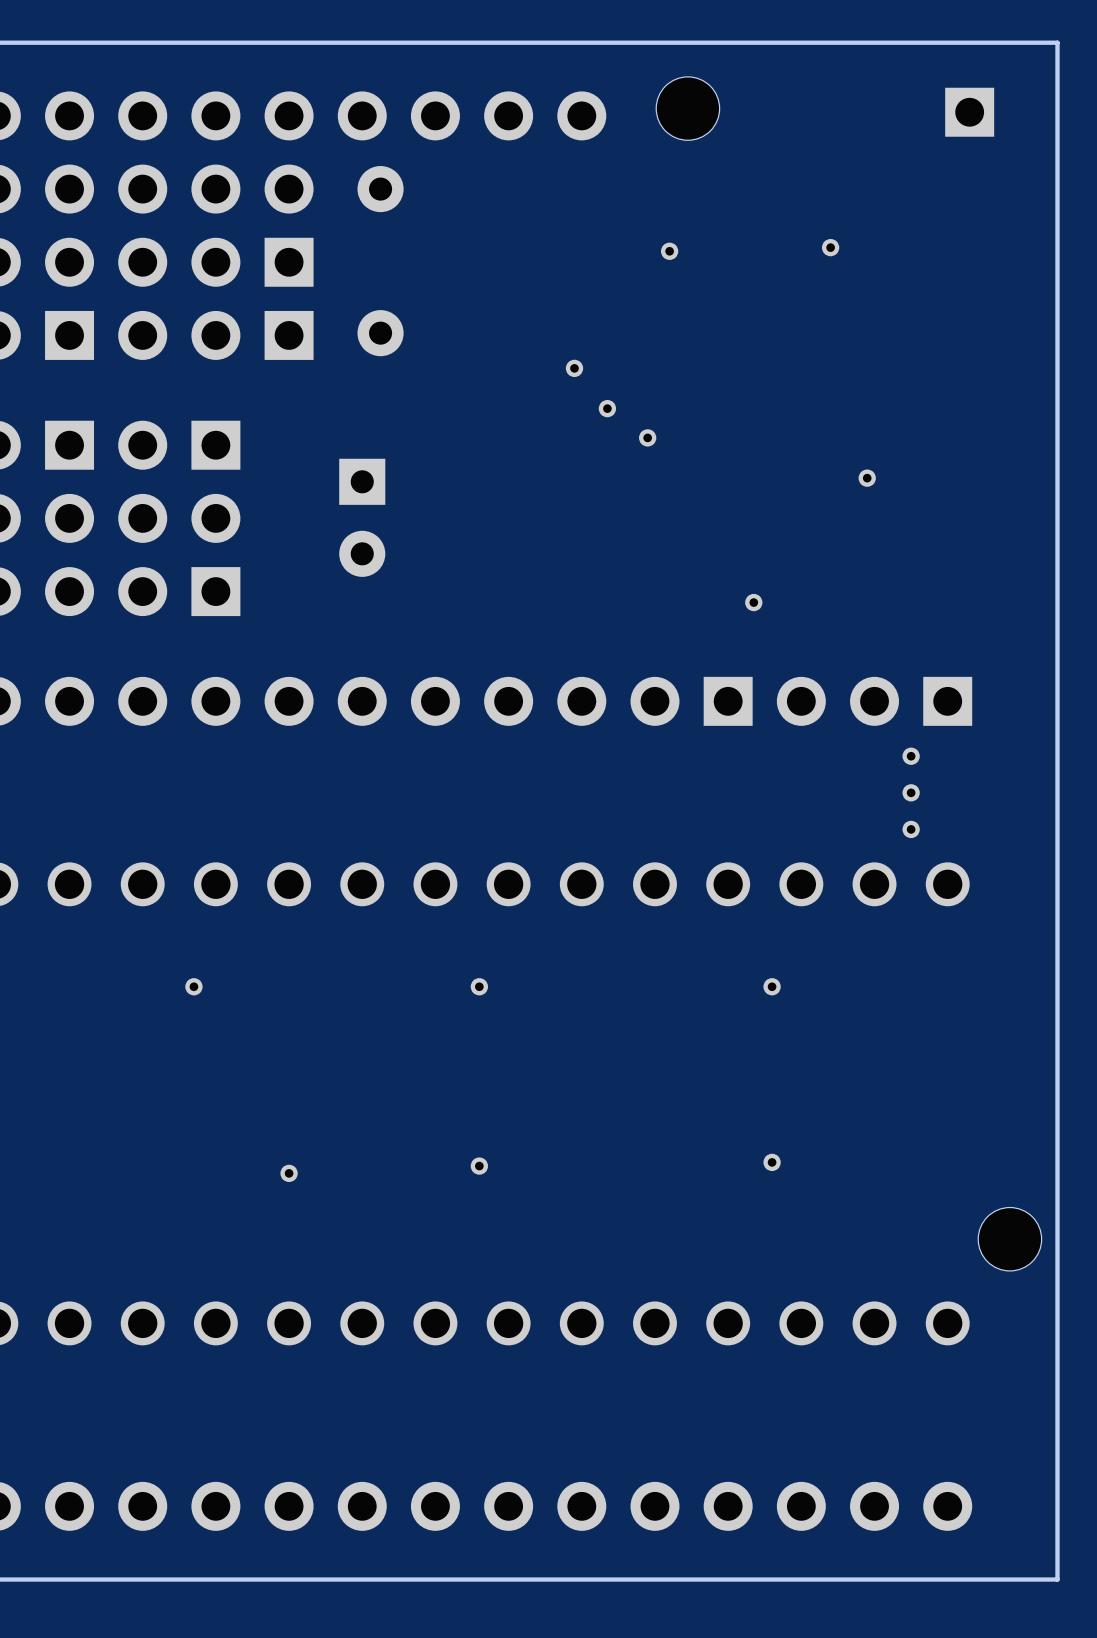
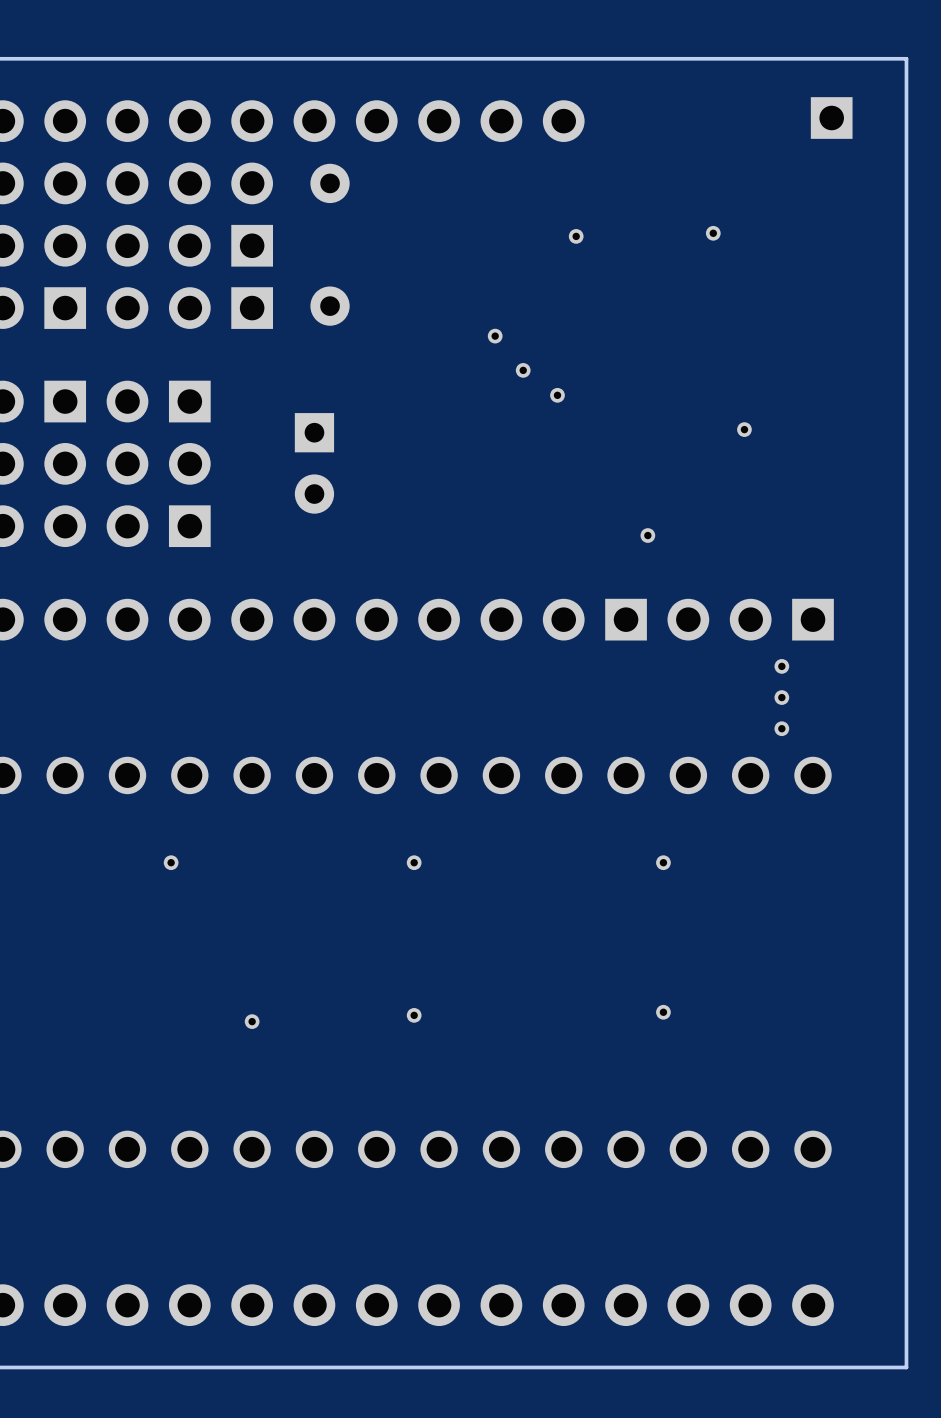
part: (687, 108) -> none
part: none -> (563, 121)
part: (1009, 1239) -> none

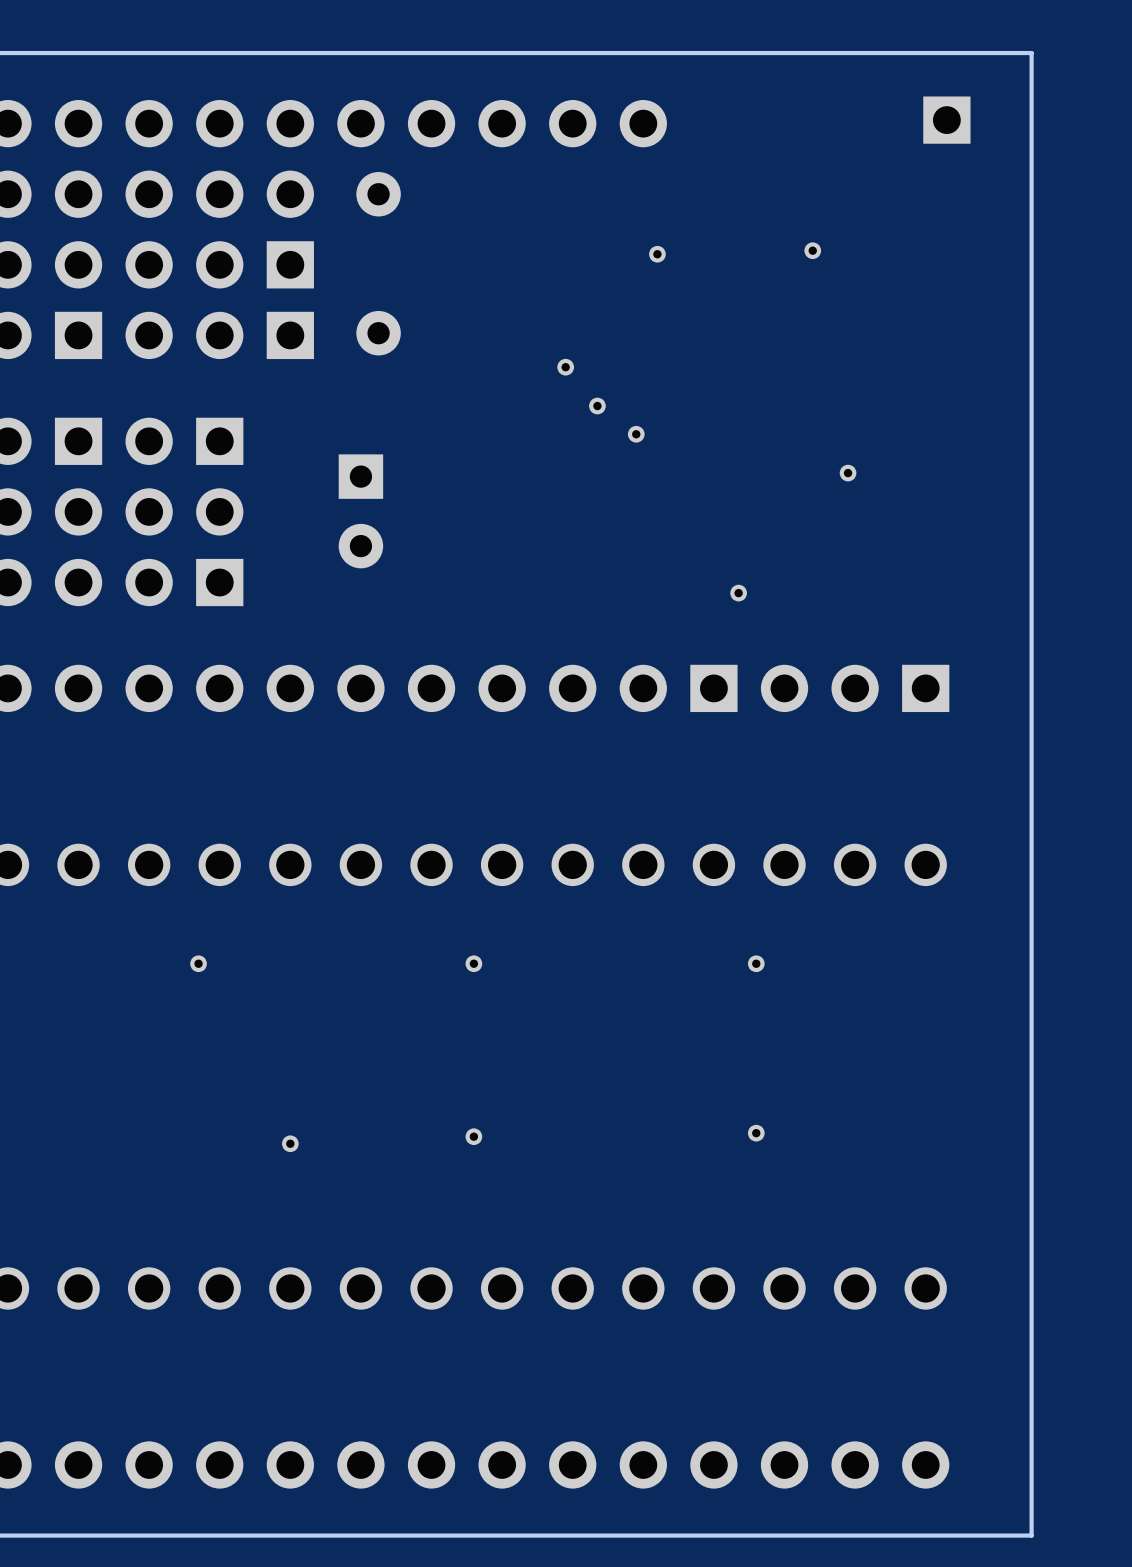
part: (781, 666) -> none
part: (781, 697) -> none
part: (781, 728) -> none

